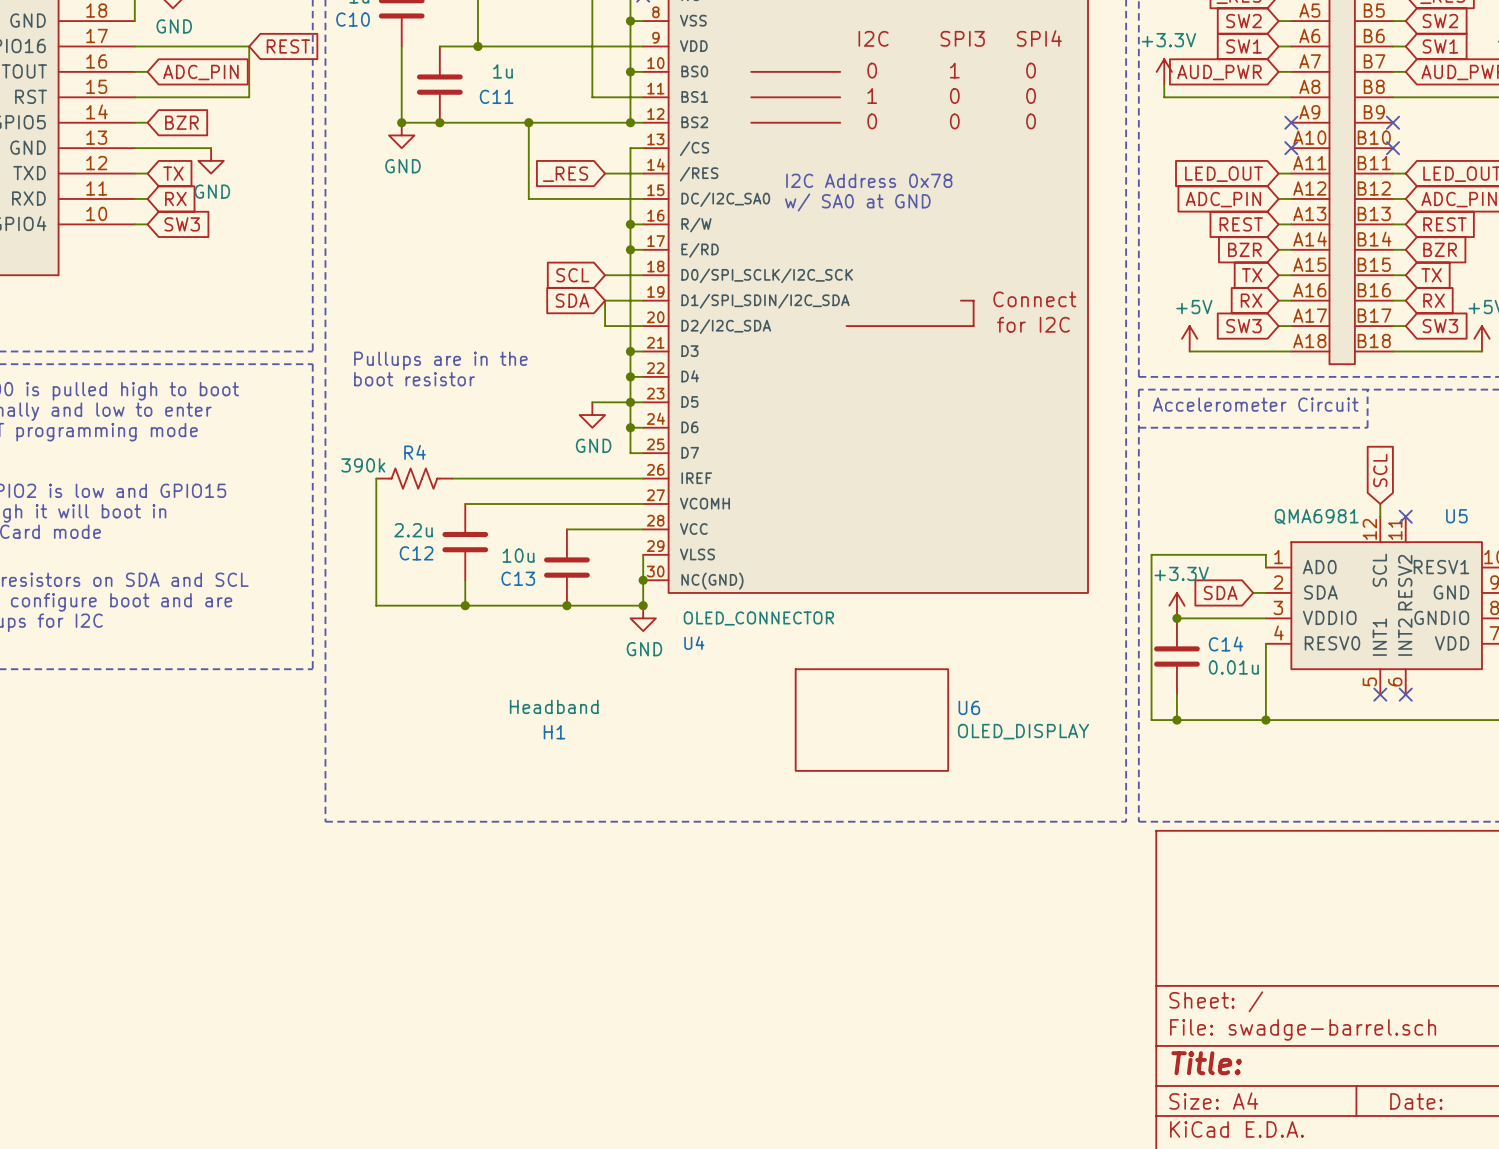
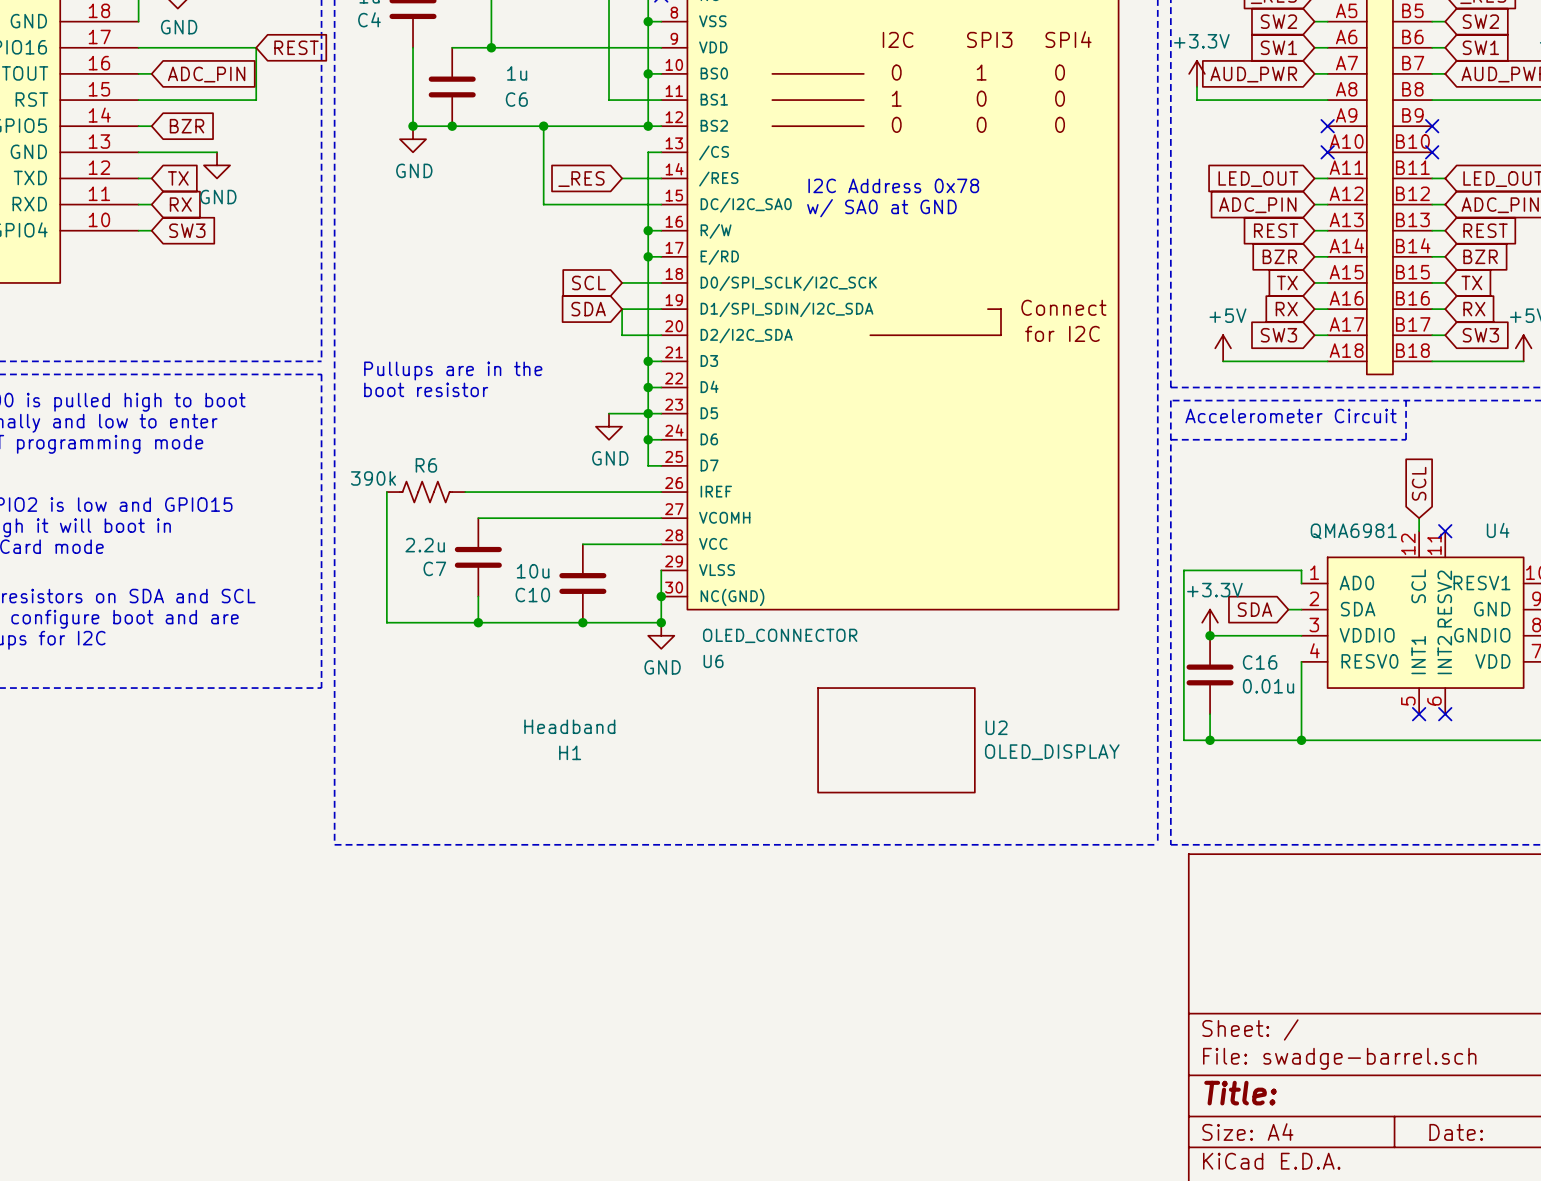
C10 name: C10 (353, 19) -> C4 (369, 19)
C11 name: C11 (496, 96) -> C6 (516, 99)
R4 name: R4 (415, 452) -> R6 (426, 465)
U5 name: U5 (1456, 516) -> U4 (1498, 530)
C12 name: C12 (416, 553) -> C7 (434, 568)
C13 name: C13 (518, 578) -> C10 (532, 595)
U4 name: U4 (694, 643) -> U6 (713, 661)
C14 name: C14 (1225, 644) -> C16 (1260, 662)
U6 name: U6 (969, 707) -> U2 (996, 727)

